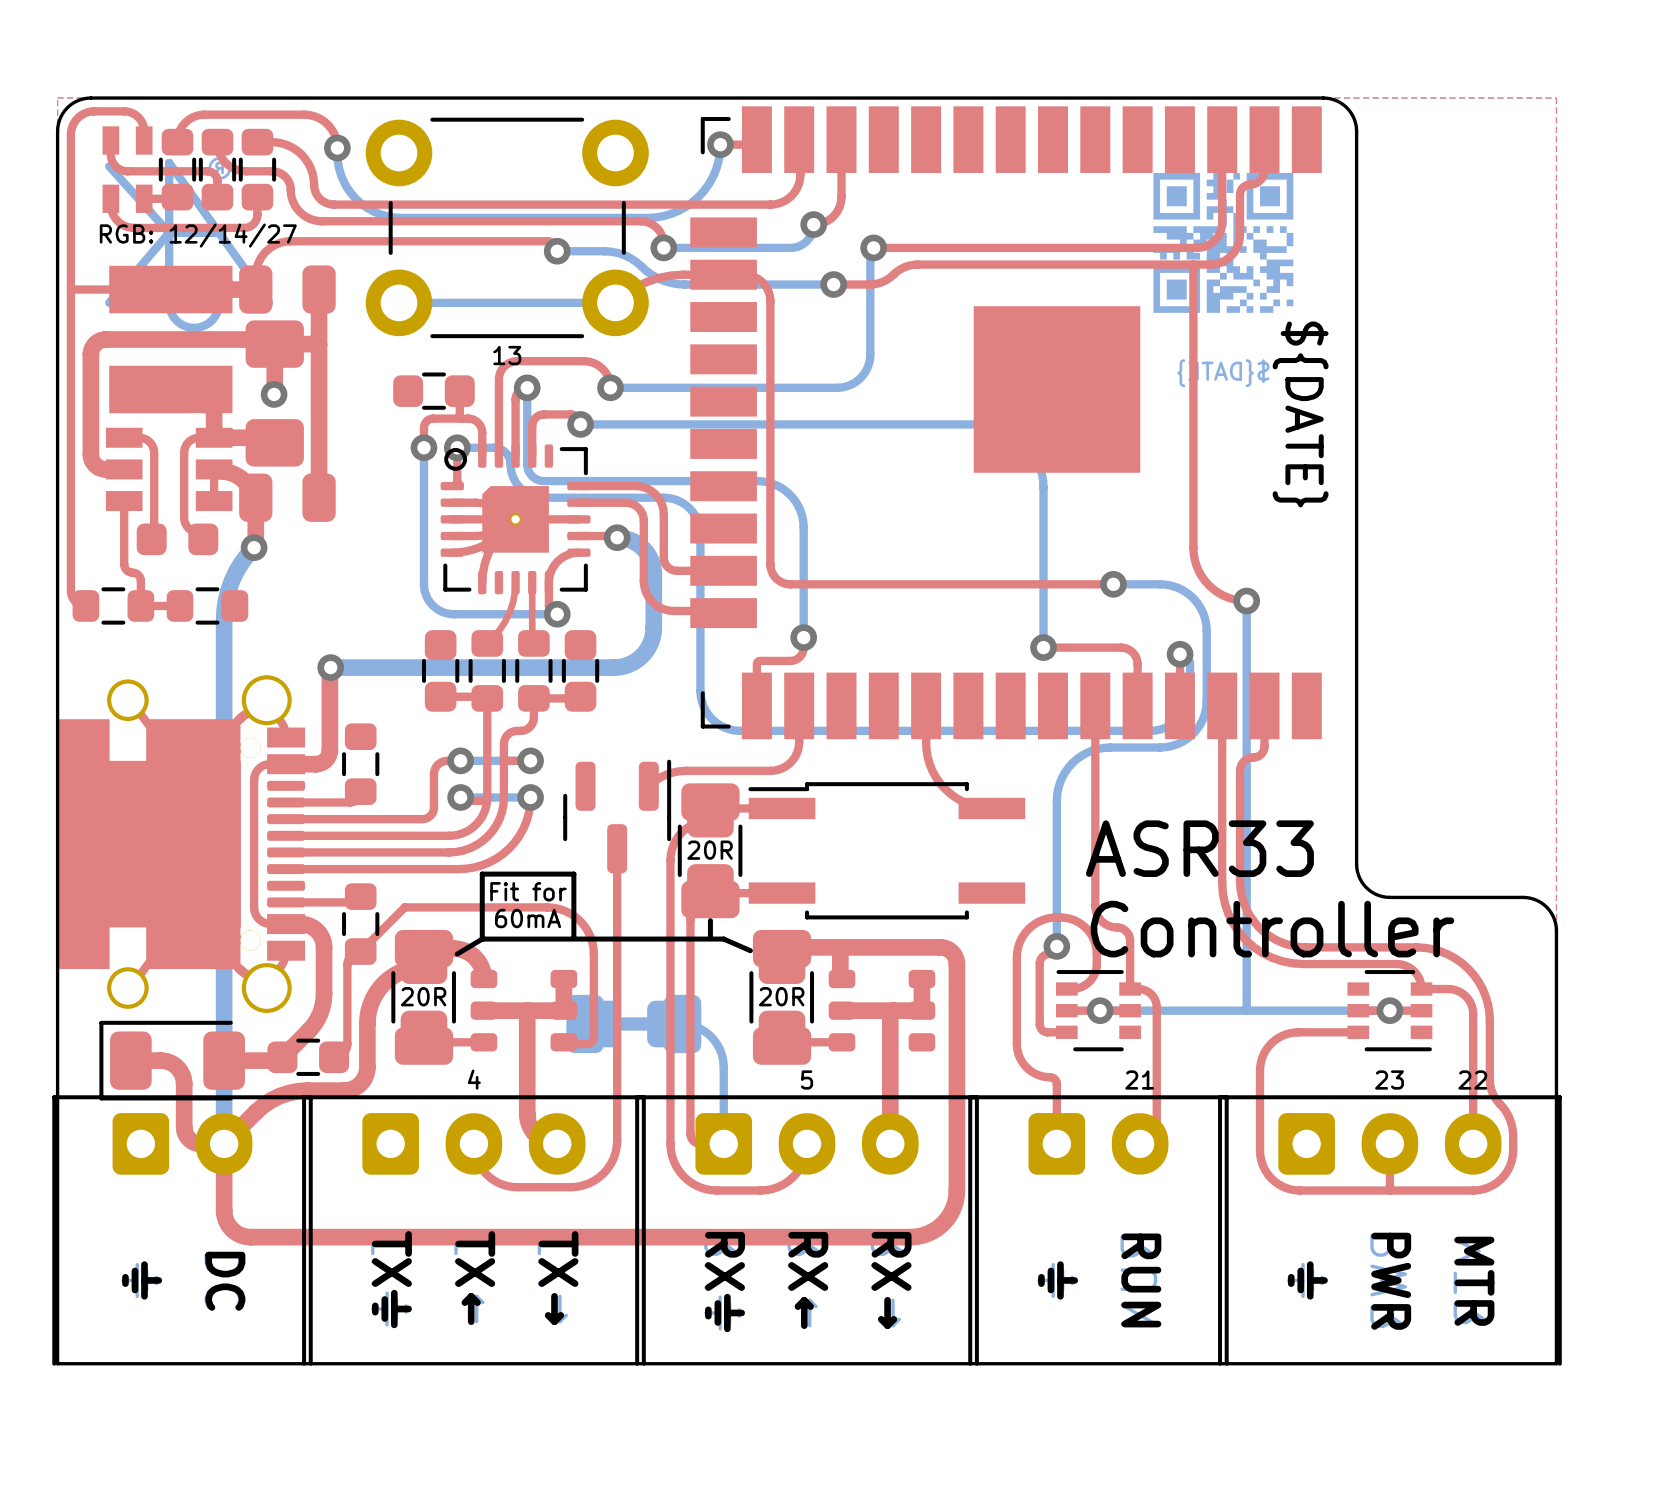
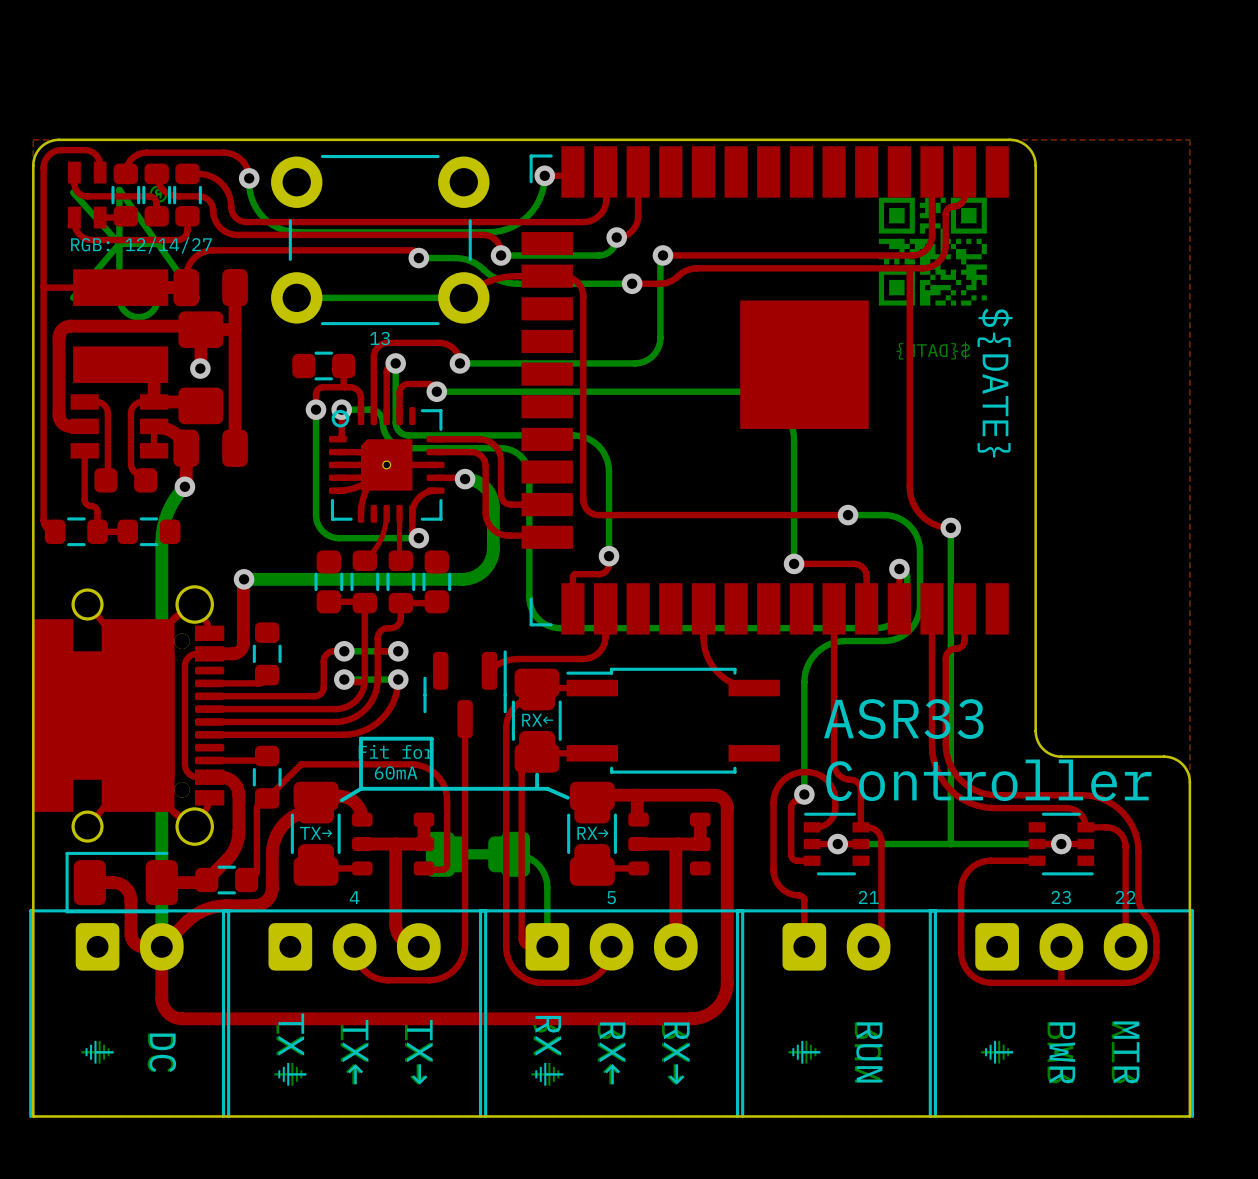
text: 20R (710, 850) -> RX← (537, 720)
text: 20R (423, 996) -> TX→ (316, 833)
text: 20R (781, 996) -> RX→ (592, 833)

